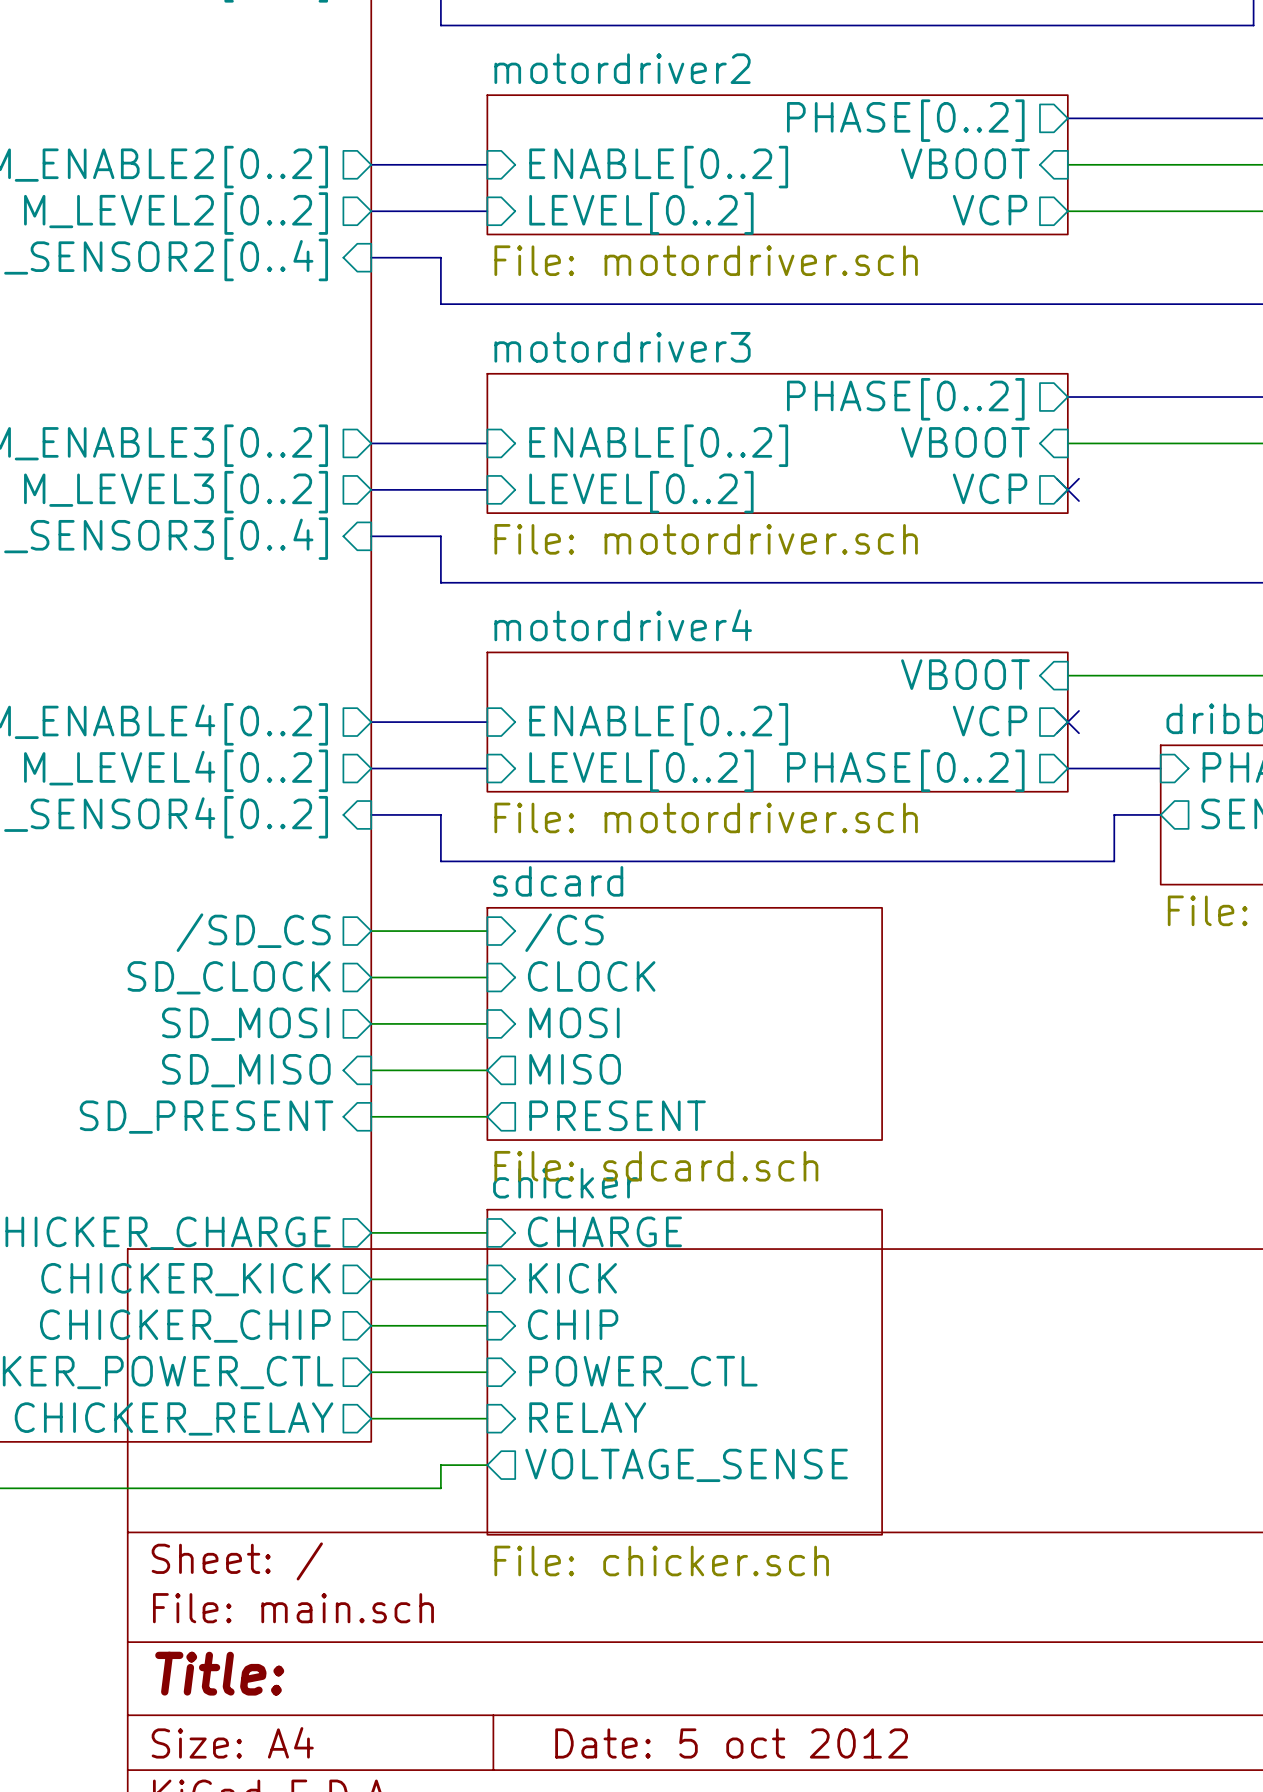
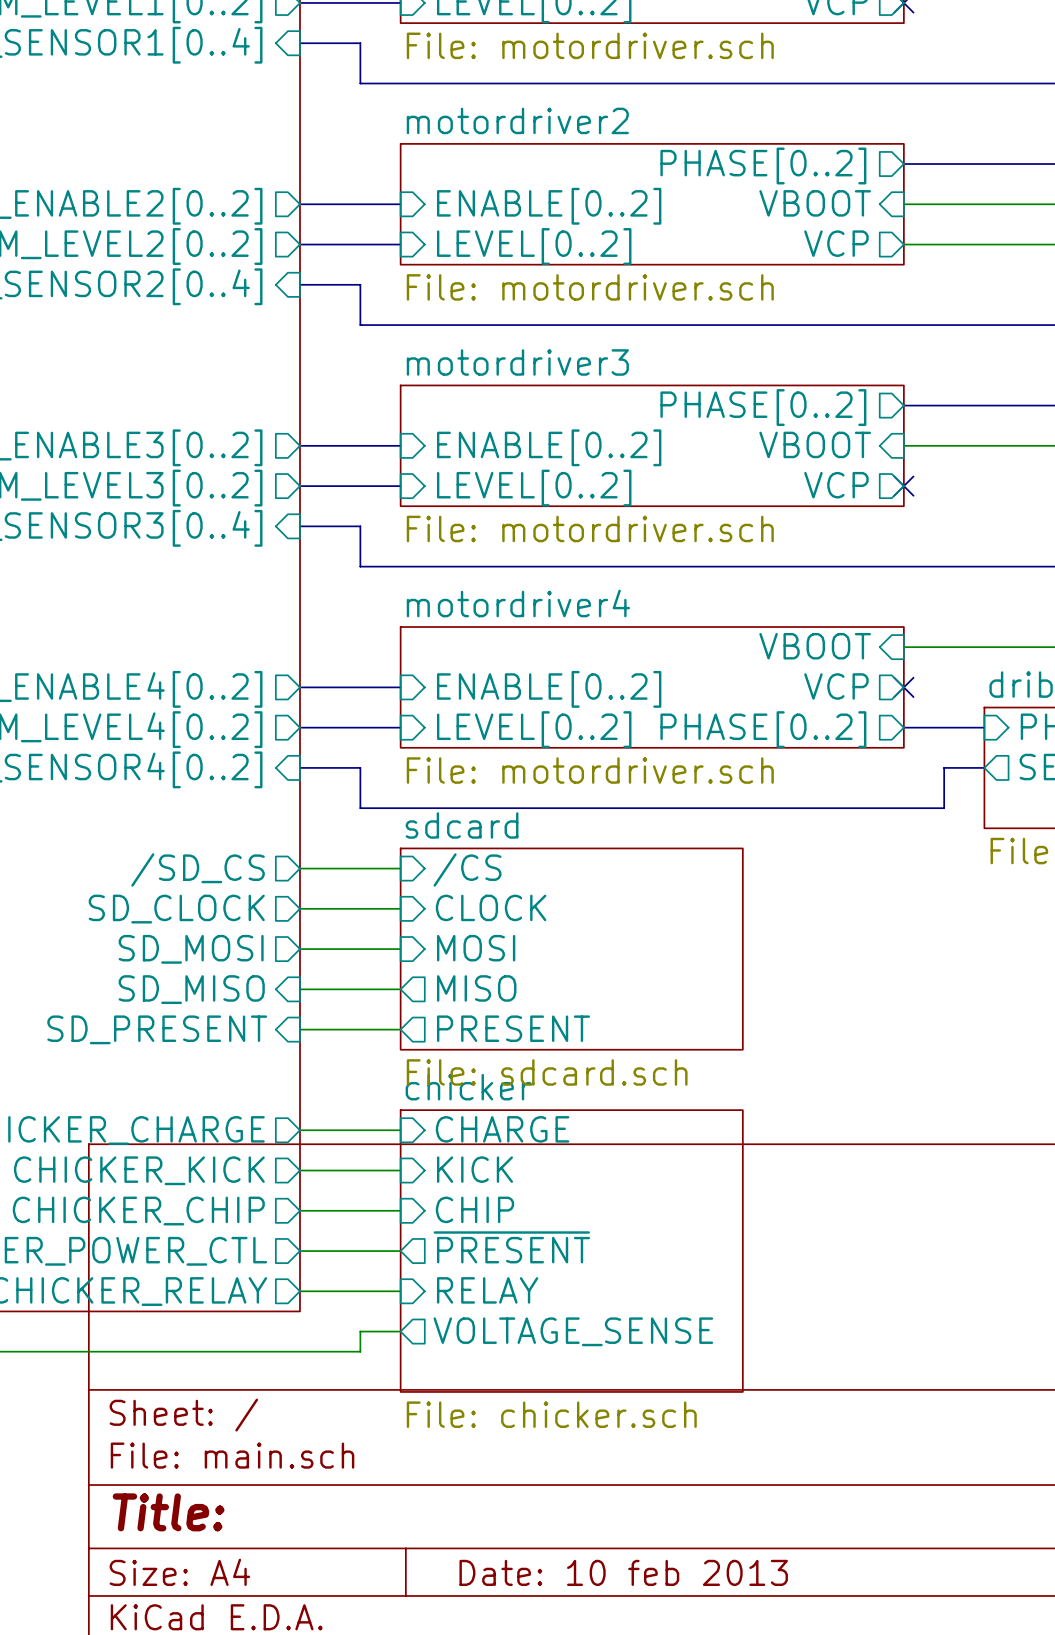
sheet pin shape: input (643, 1372) -> output (511, 1247)
sheet pin: POWER_CTL (643, 1372) -> ~{PRESENT} (511, 1247)
title block: Date: 5 oct 2012 (731, 1743) -> Date: 10 feb 2013 (623, 1572)

